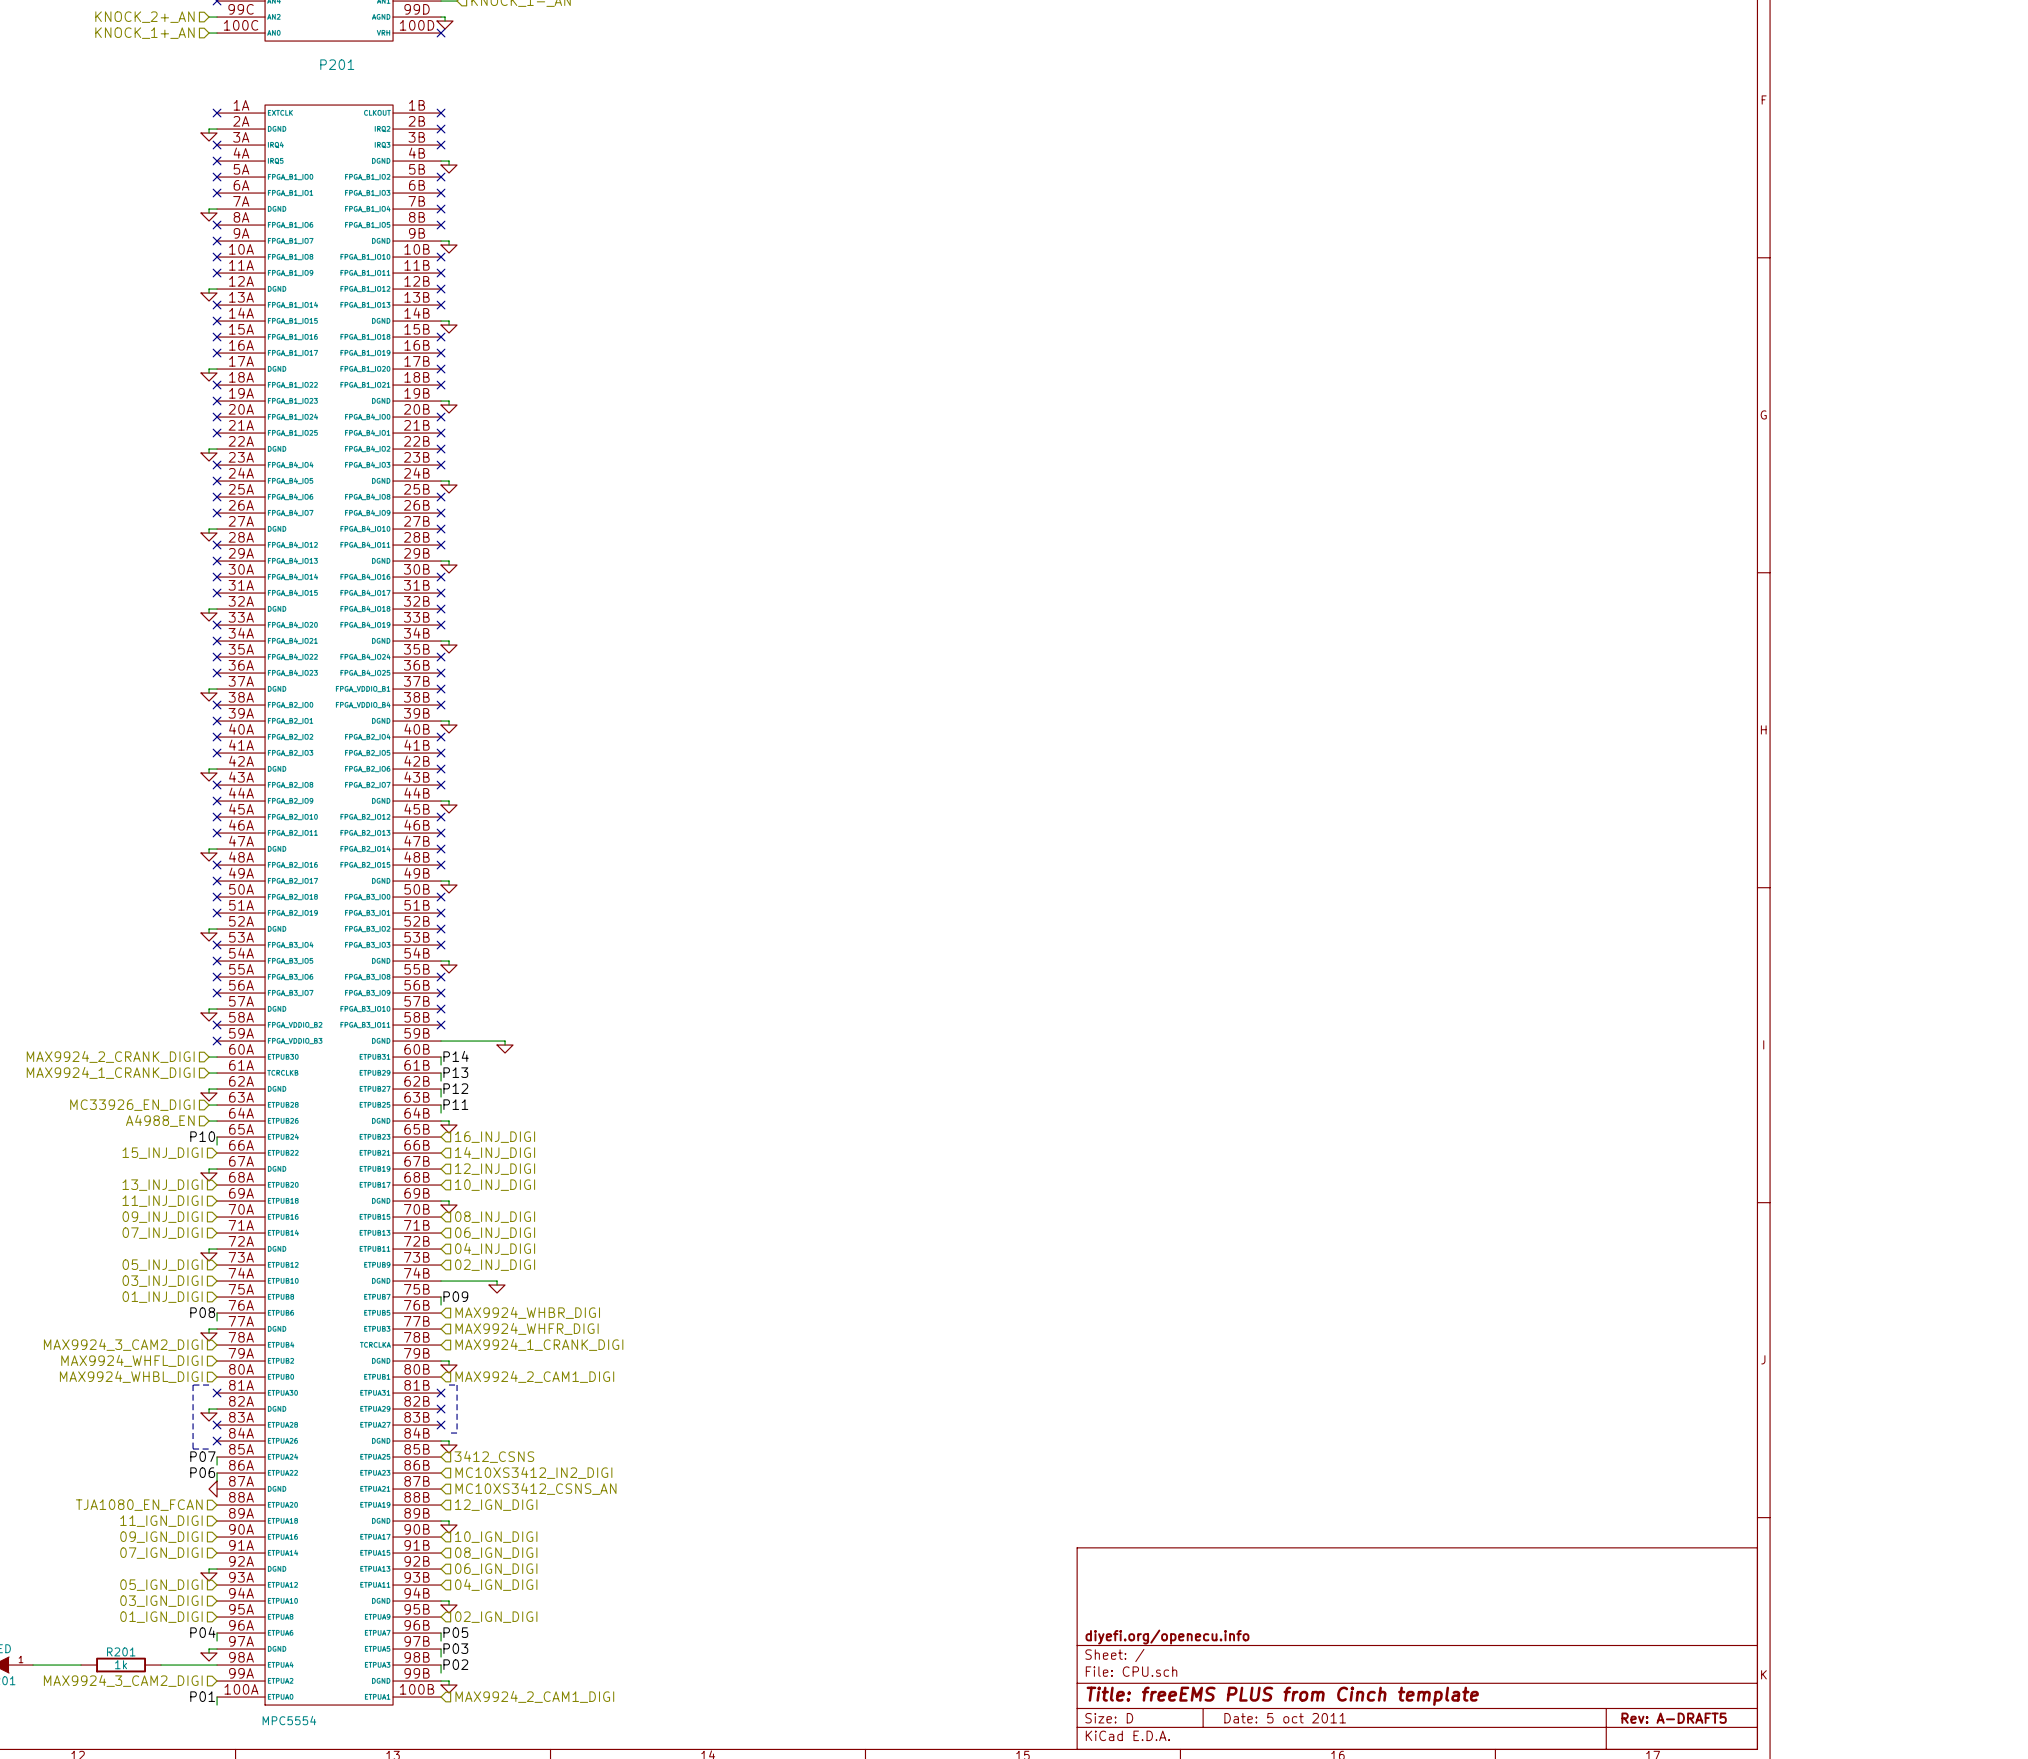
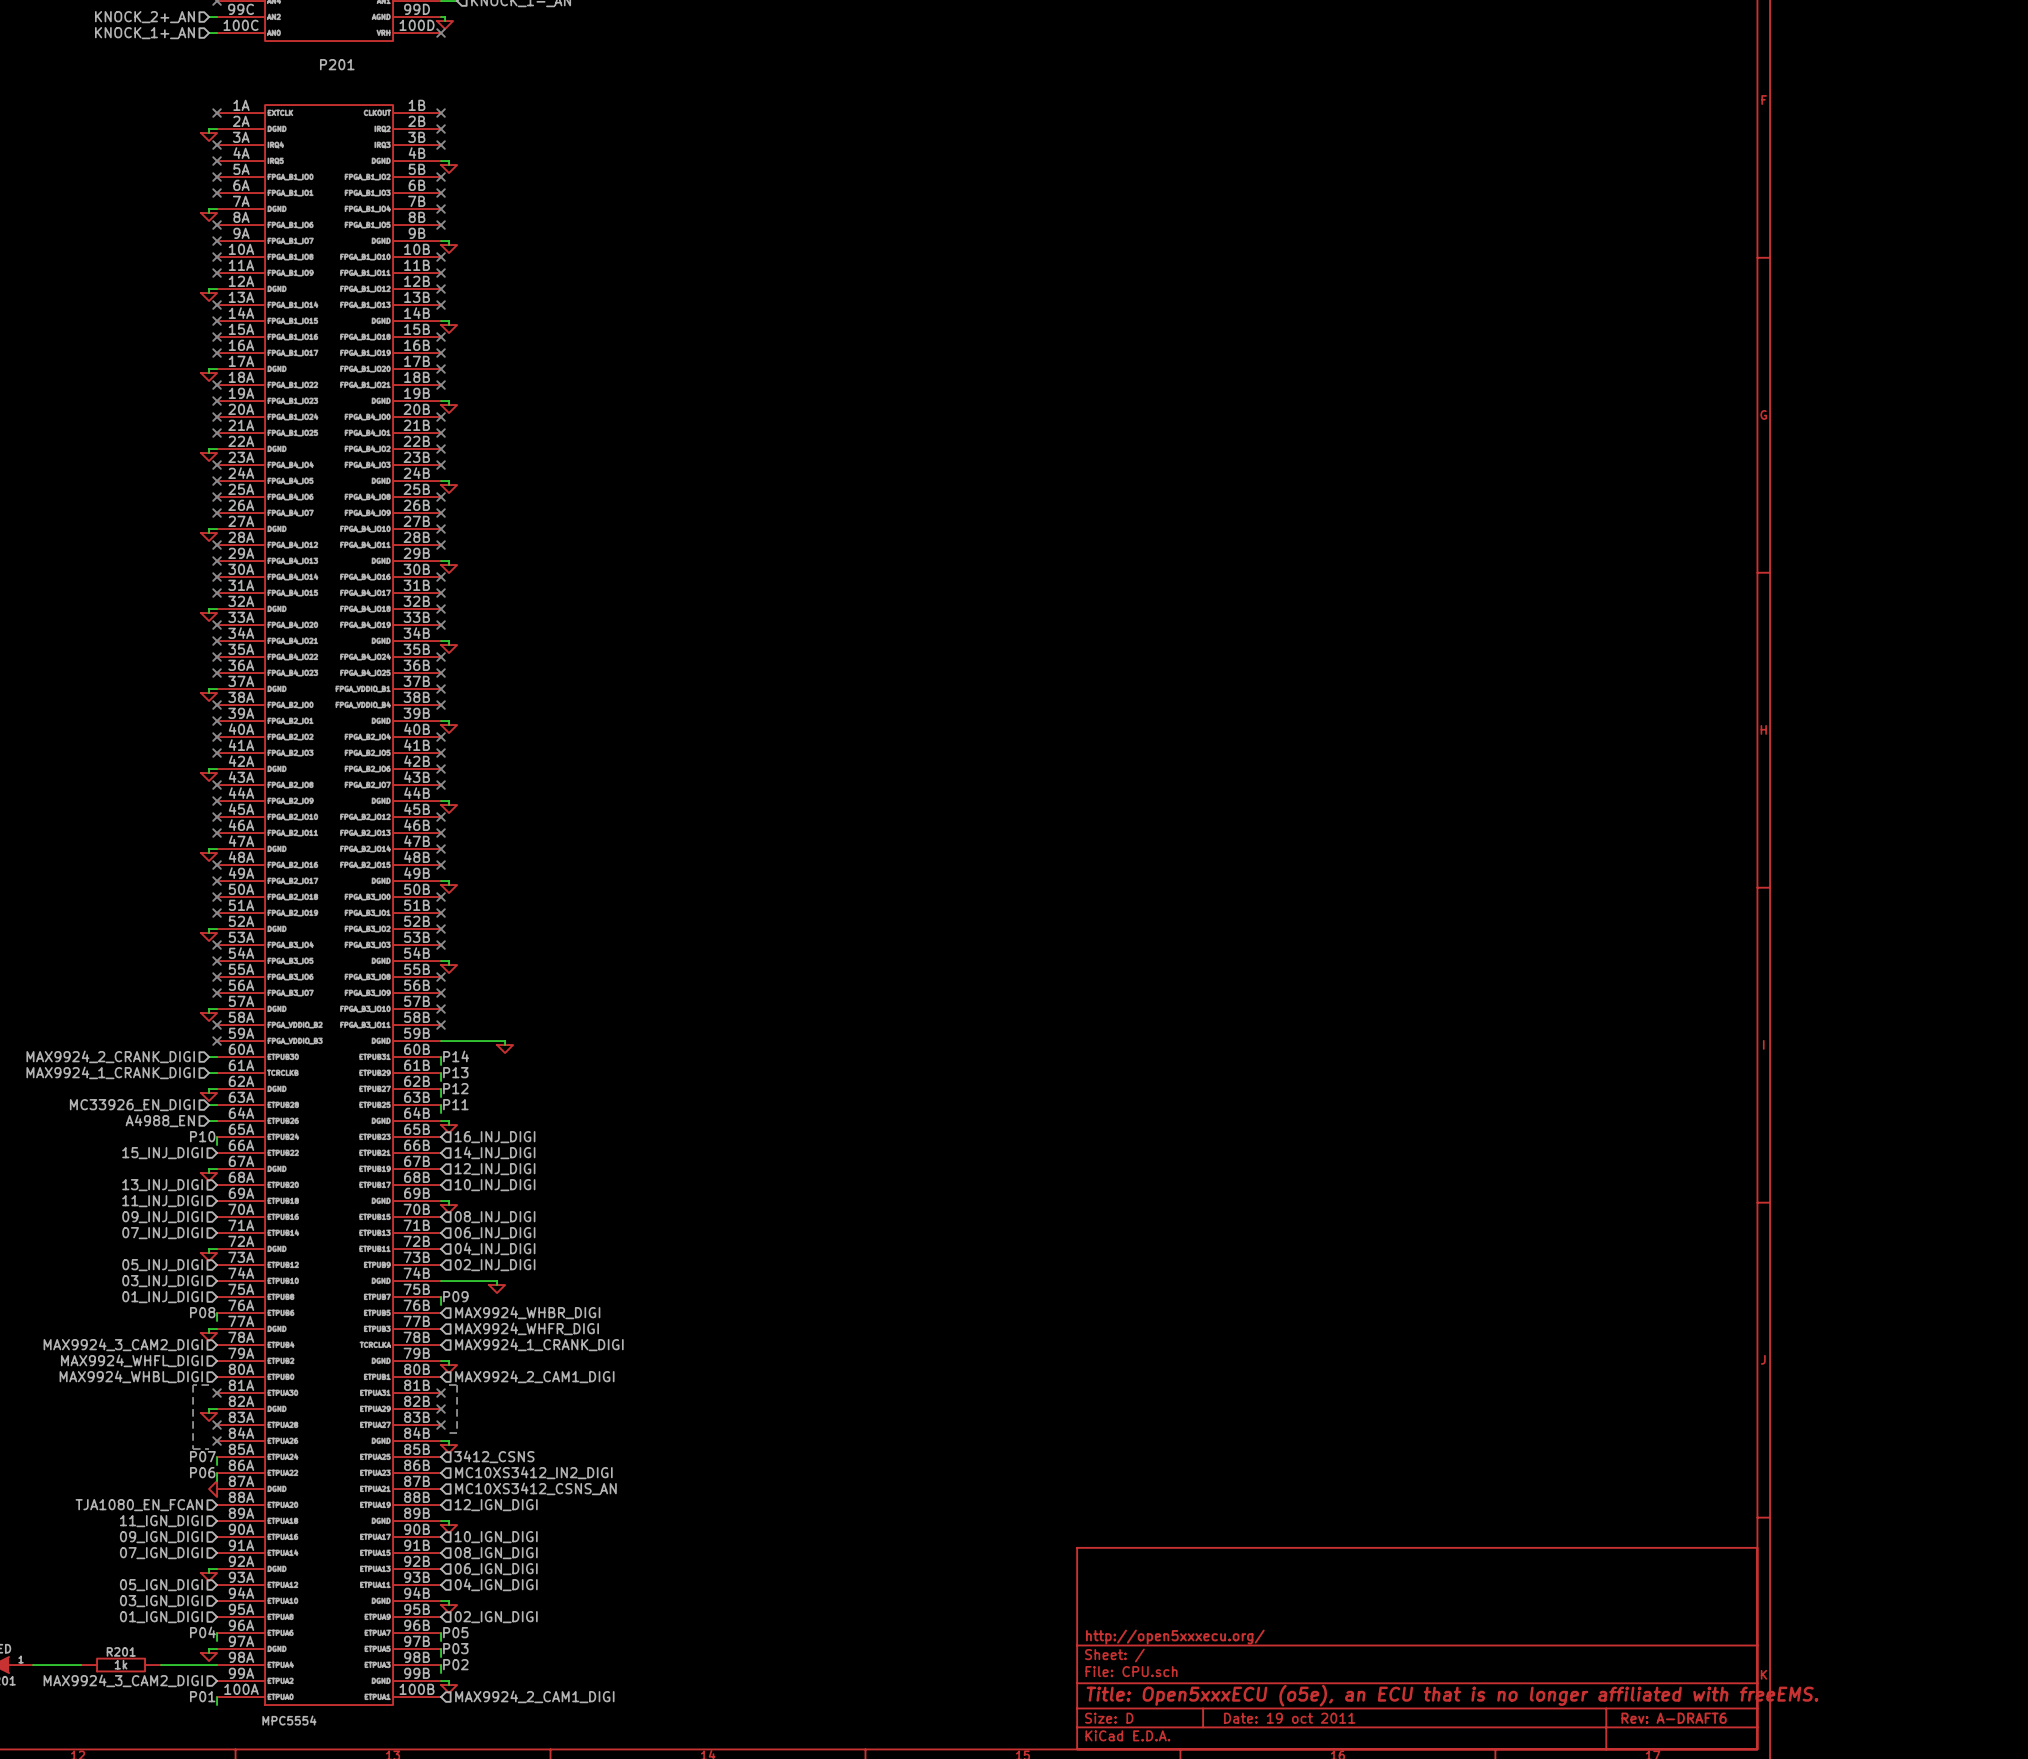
title block: diyefi.org/openecu.info (1167, 1637) -> http://open5xxxecu.org/ (1175, 1637)
title block: Title: freeEMS PLUS from Cinch template (1282, 1696) -> Title: Open5xxxECU (o5e), an ECU that is no longer affiliated with freeEMS. (1452, 1695)
title block: Date: 5 oct 2011 (1285, 1718) -> Date: 19 oct 2011 (1289, 1718)
title block: Rev: A-DRAFT5 (1674, 1718) -> Rev: A-DRAFT6 (1674, 1718)

